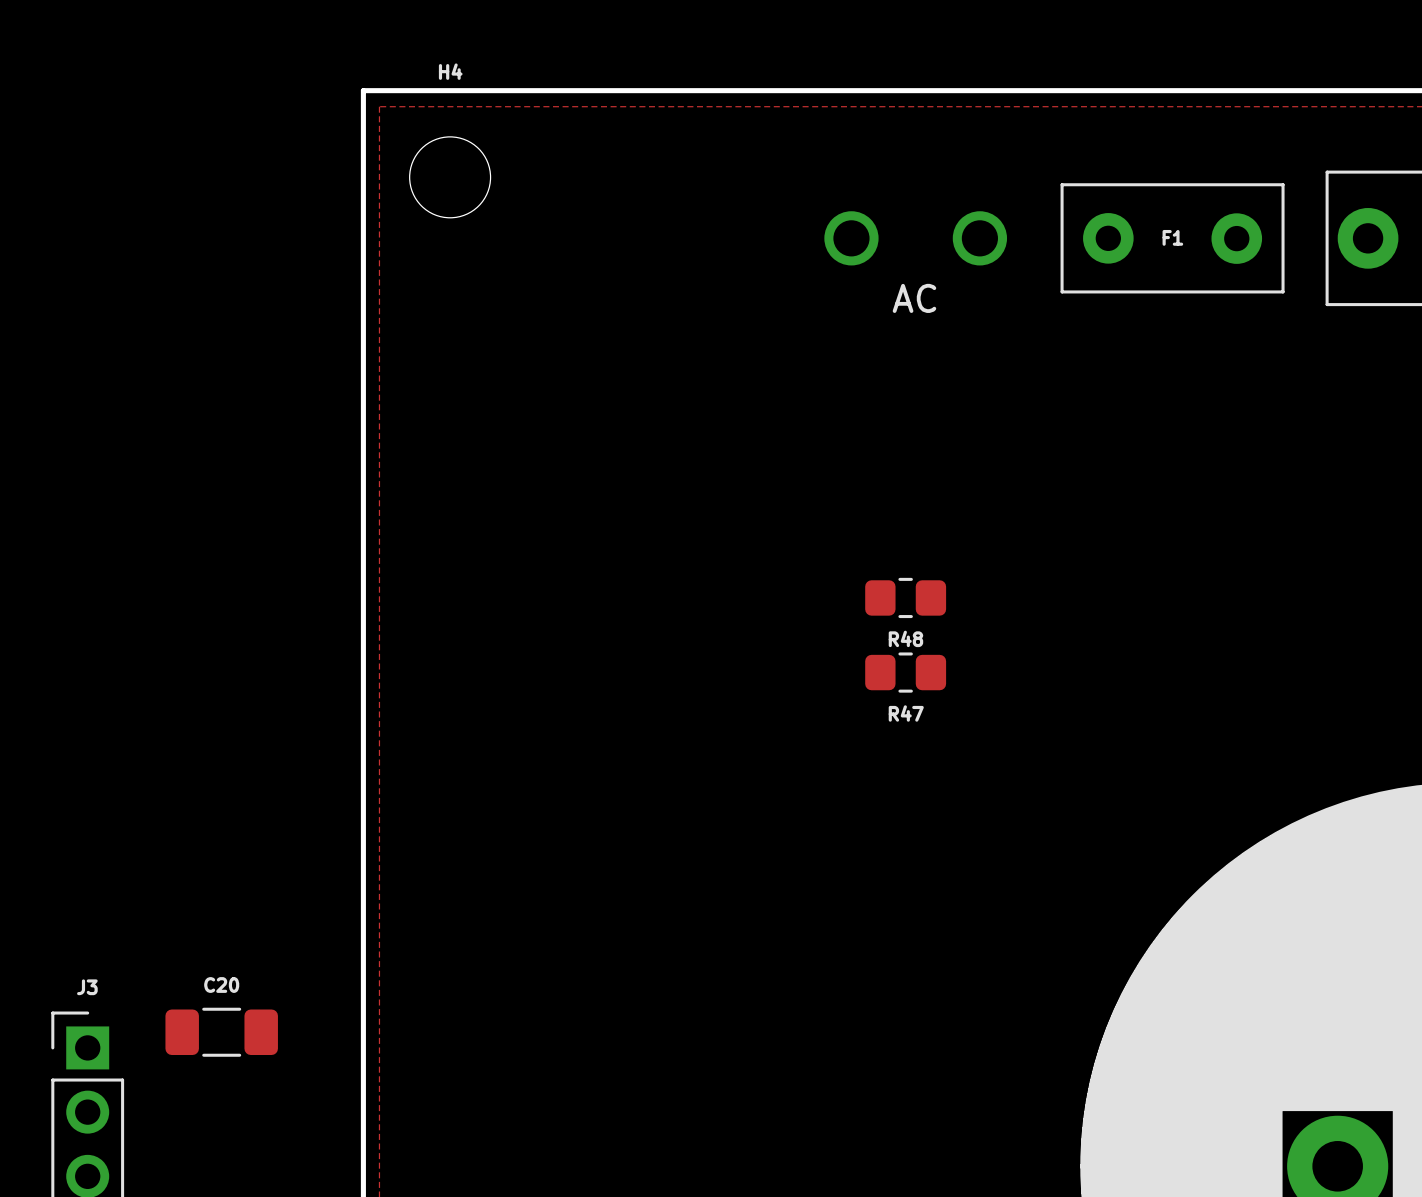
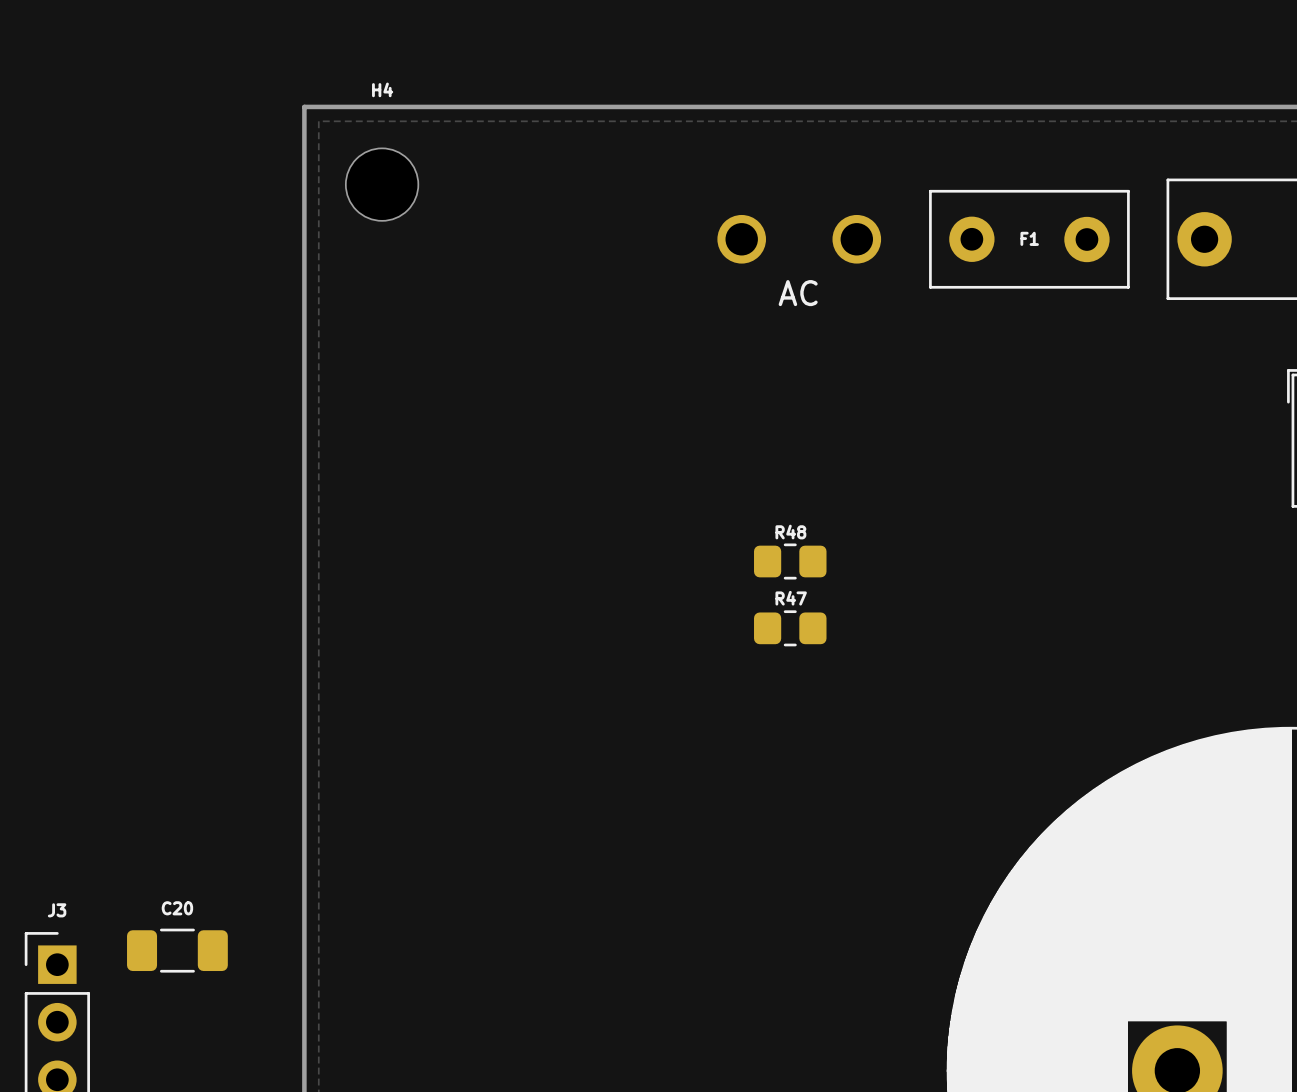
R48 name position: R48 (905, 638) -> R48 (790, 532)
R47 name position: R47 (906, 713) -> R47 (791, 598)

